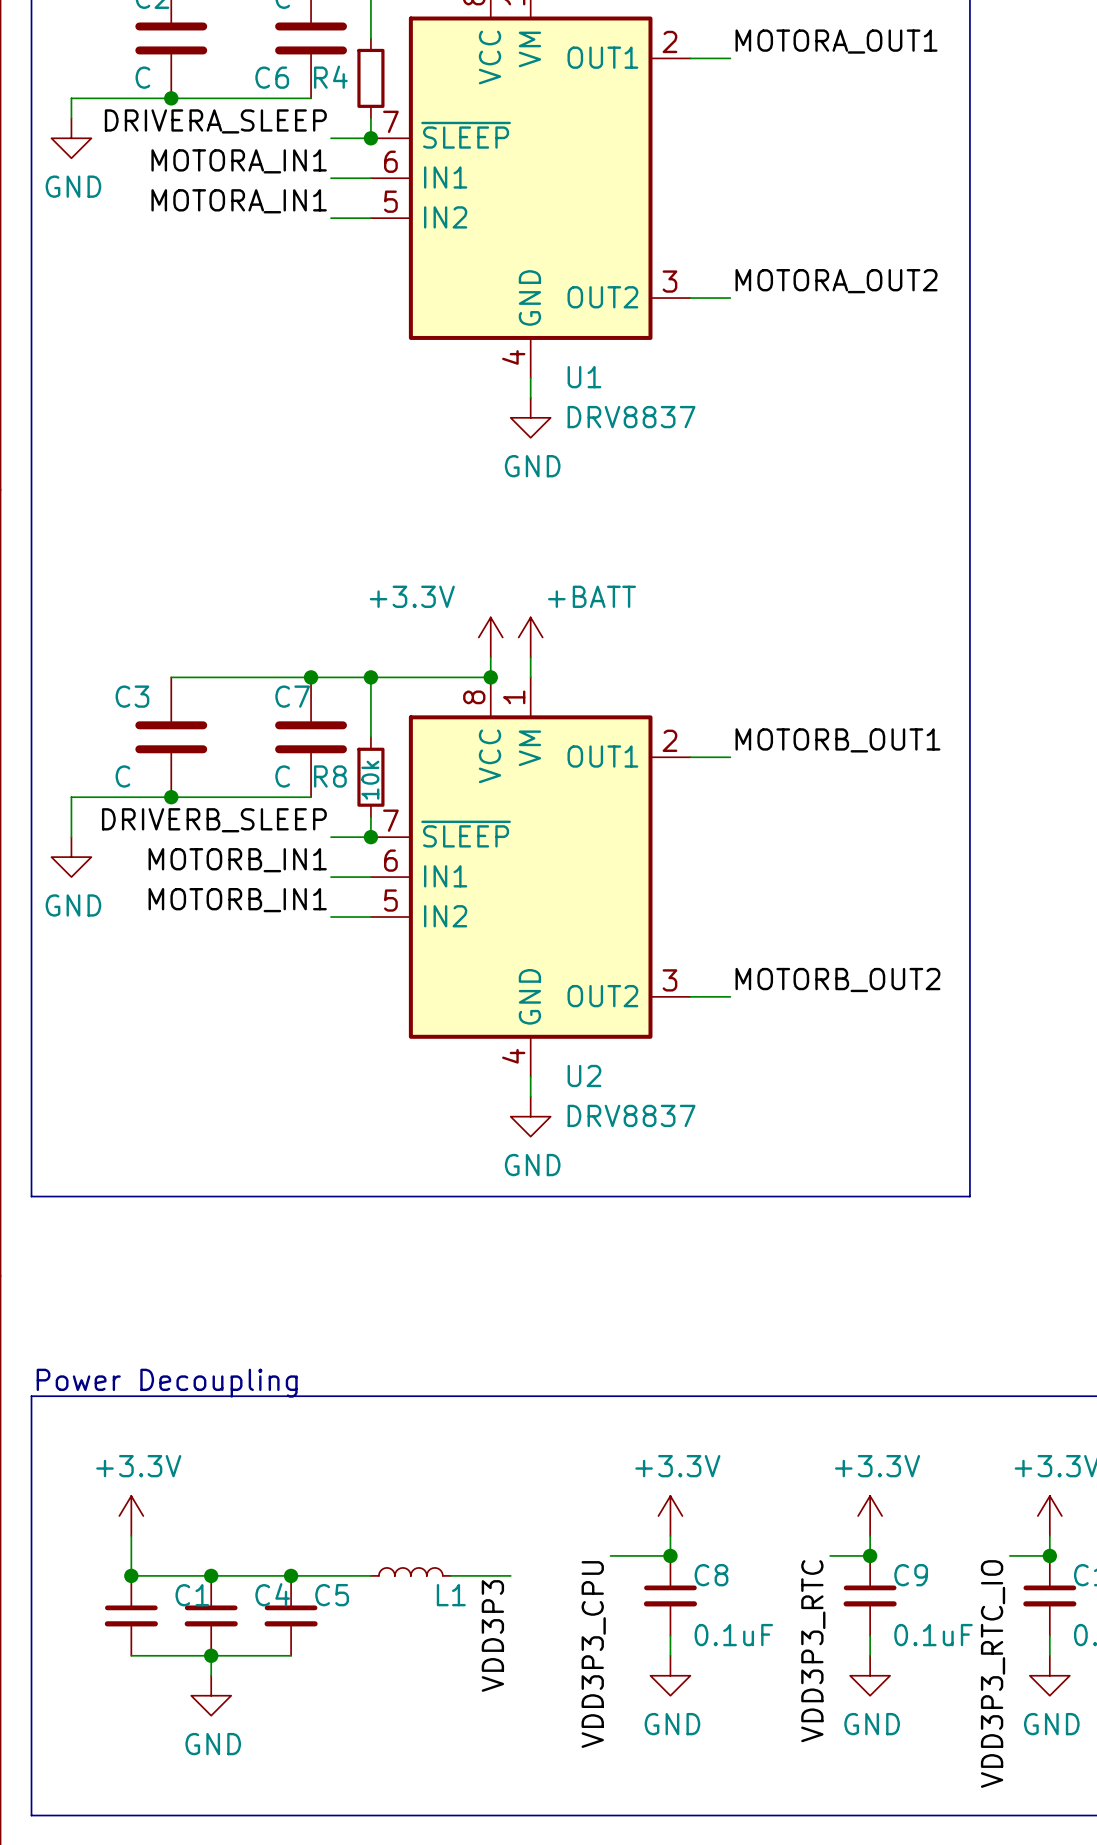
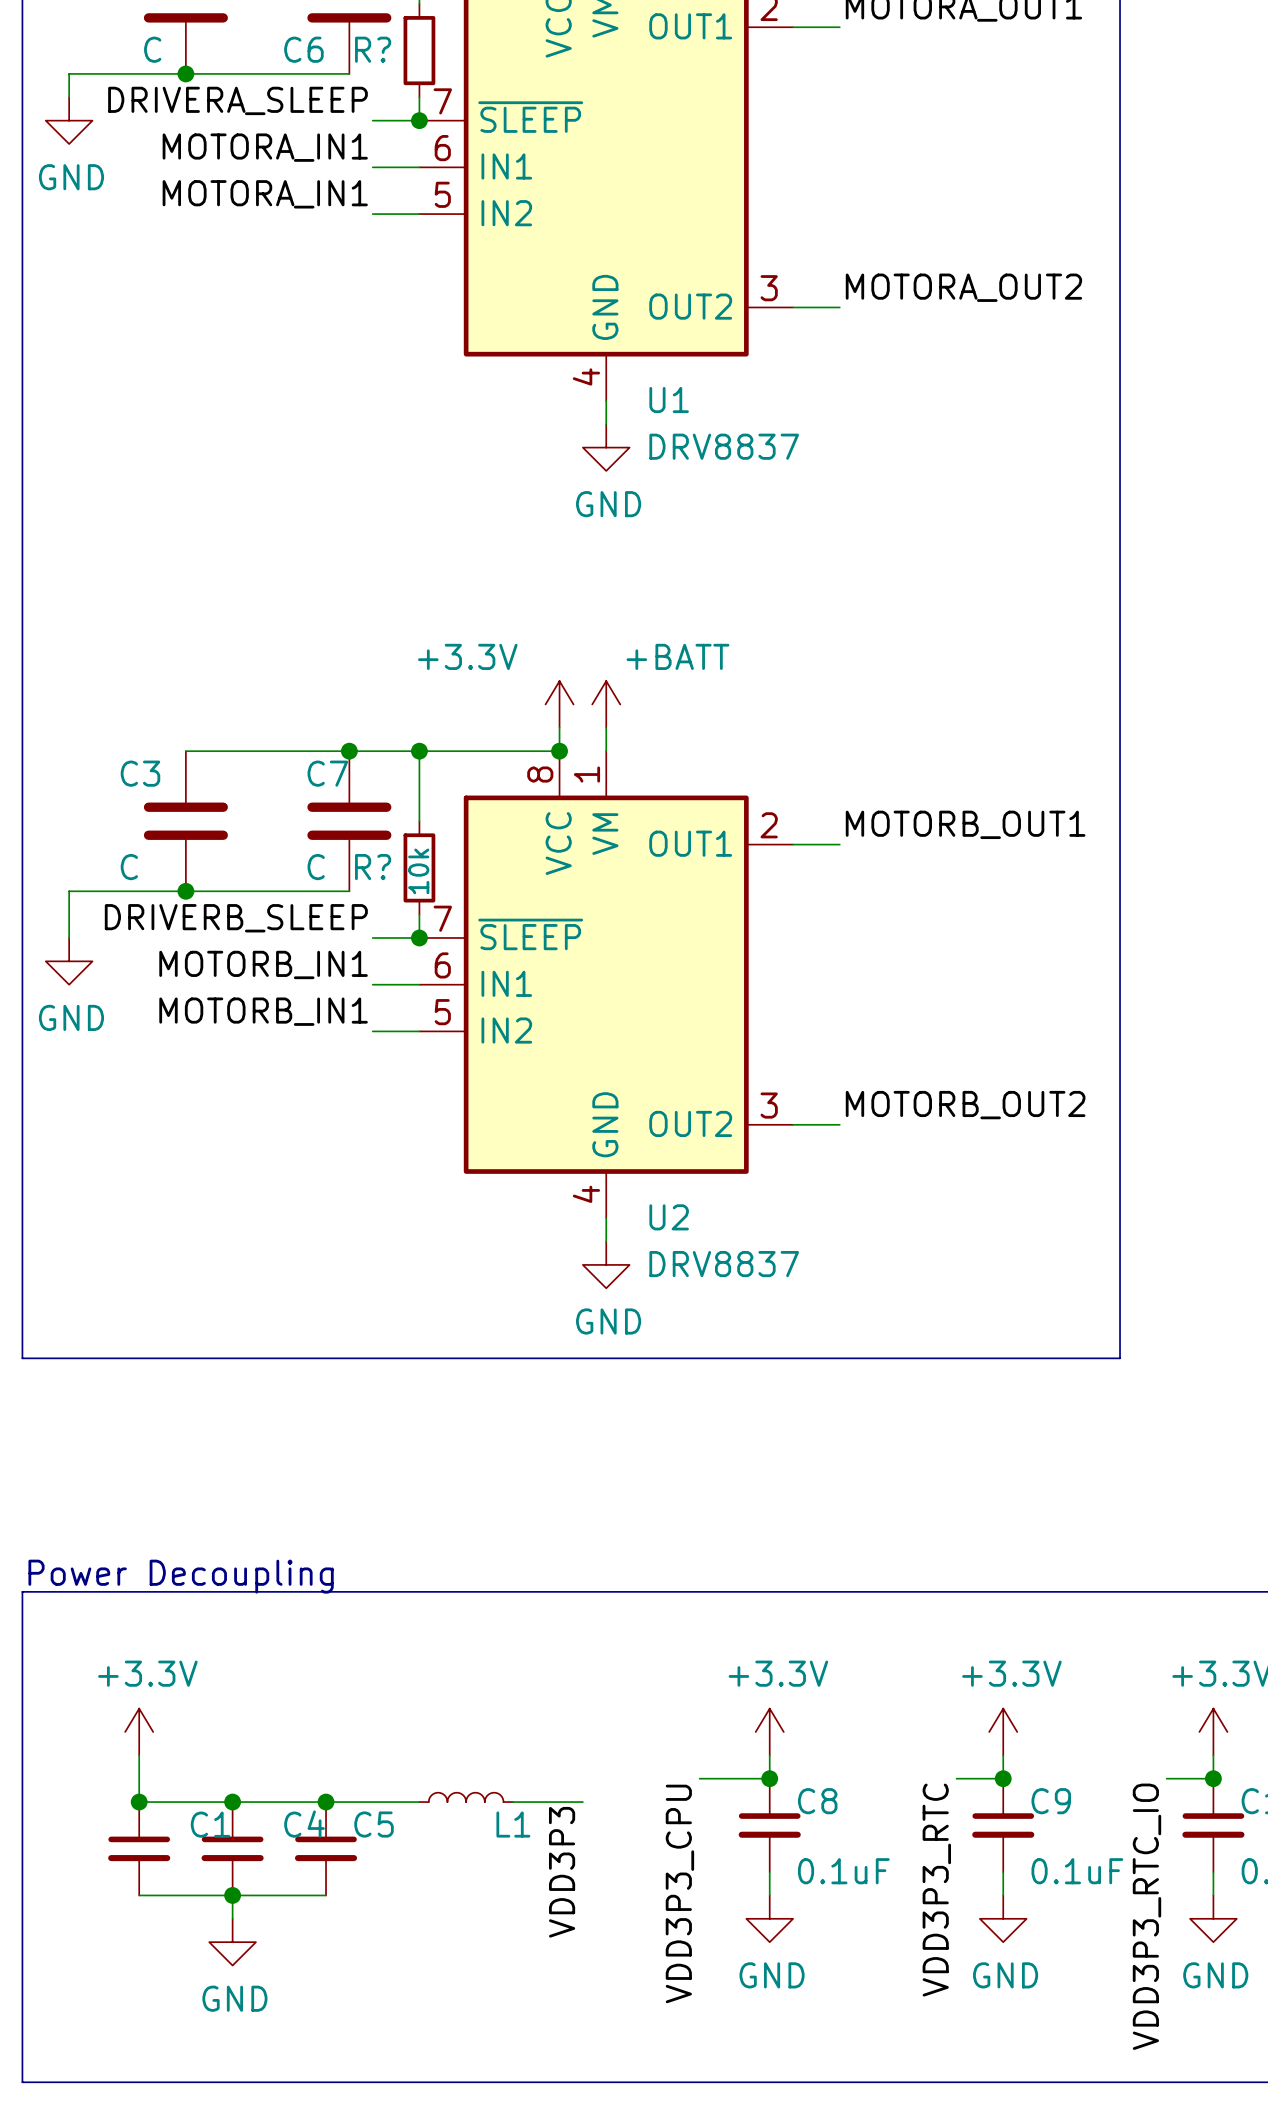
R4 name: R4 (330, 77) -> R? (373, 49)
R8 name: R8 (330, 776) -> R? (373, 867)

